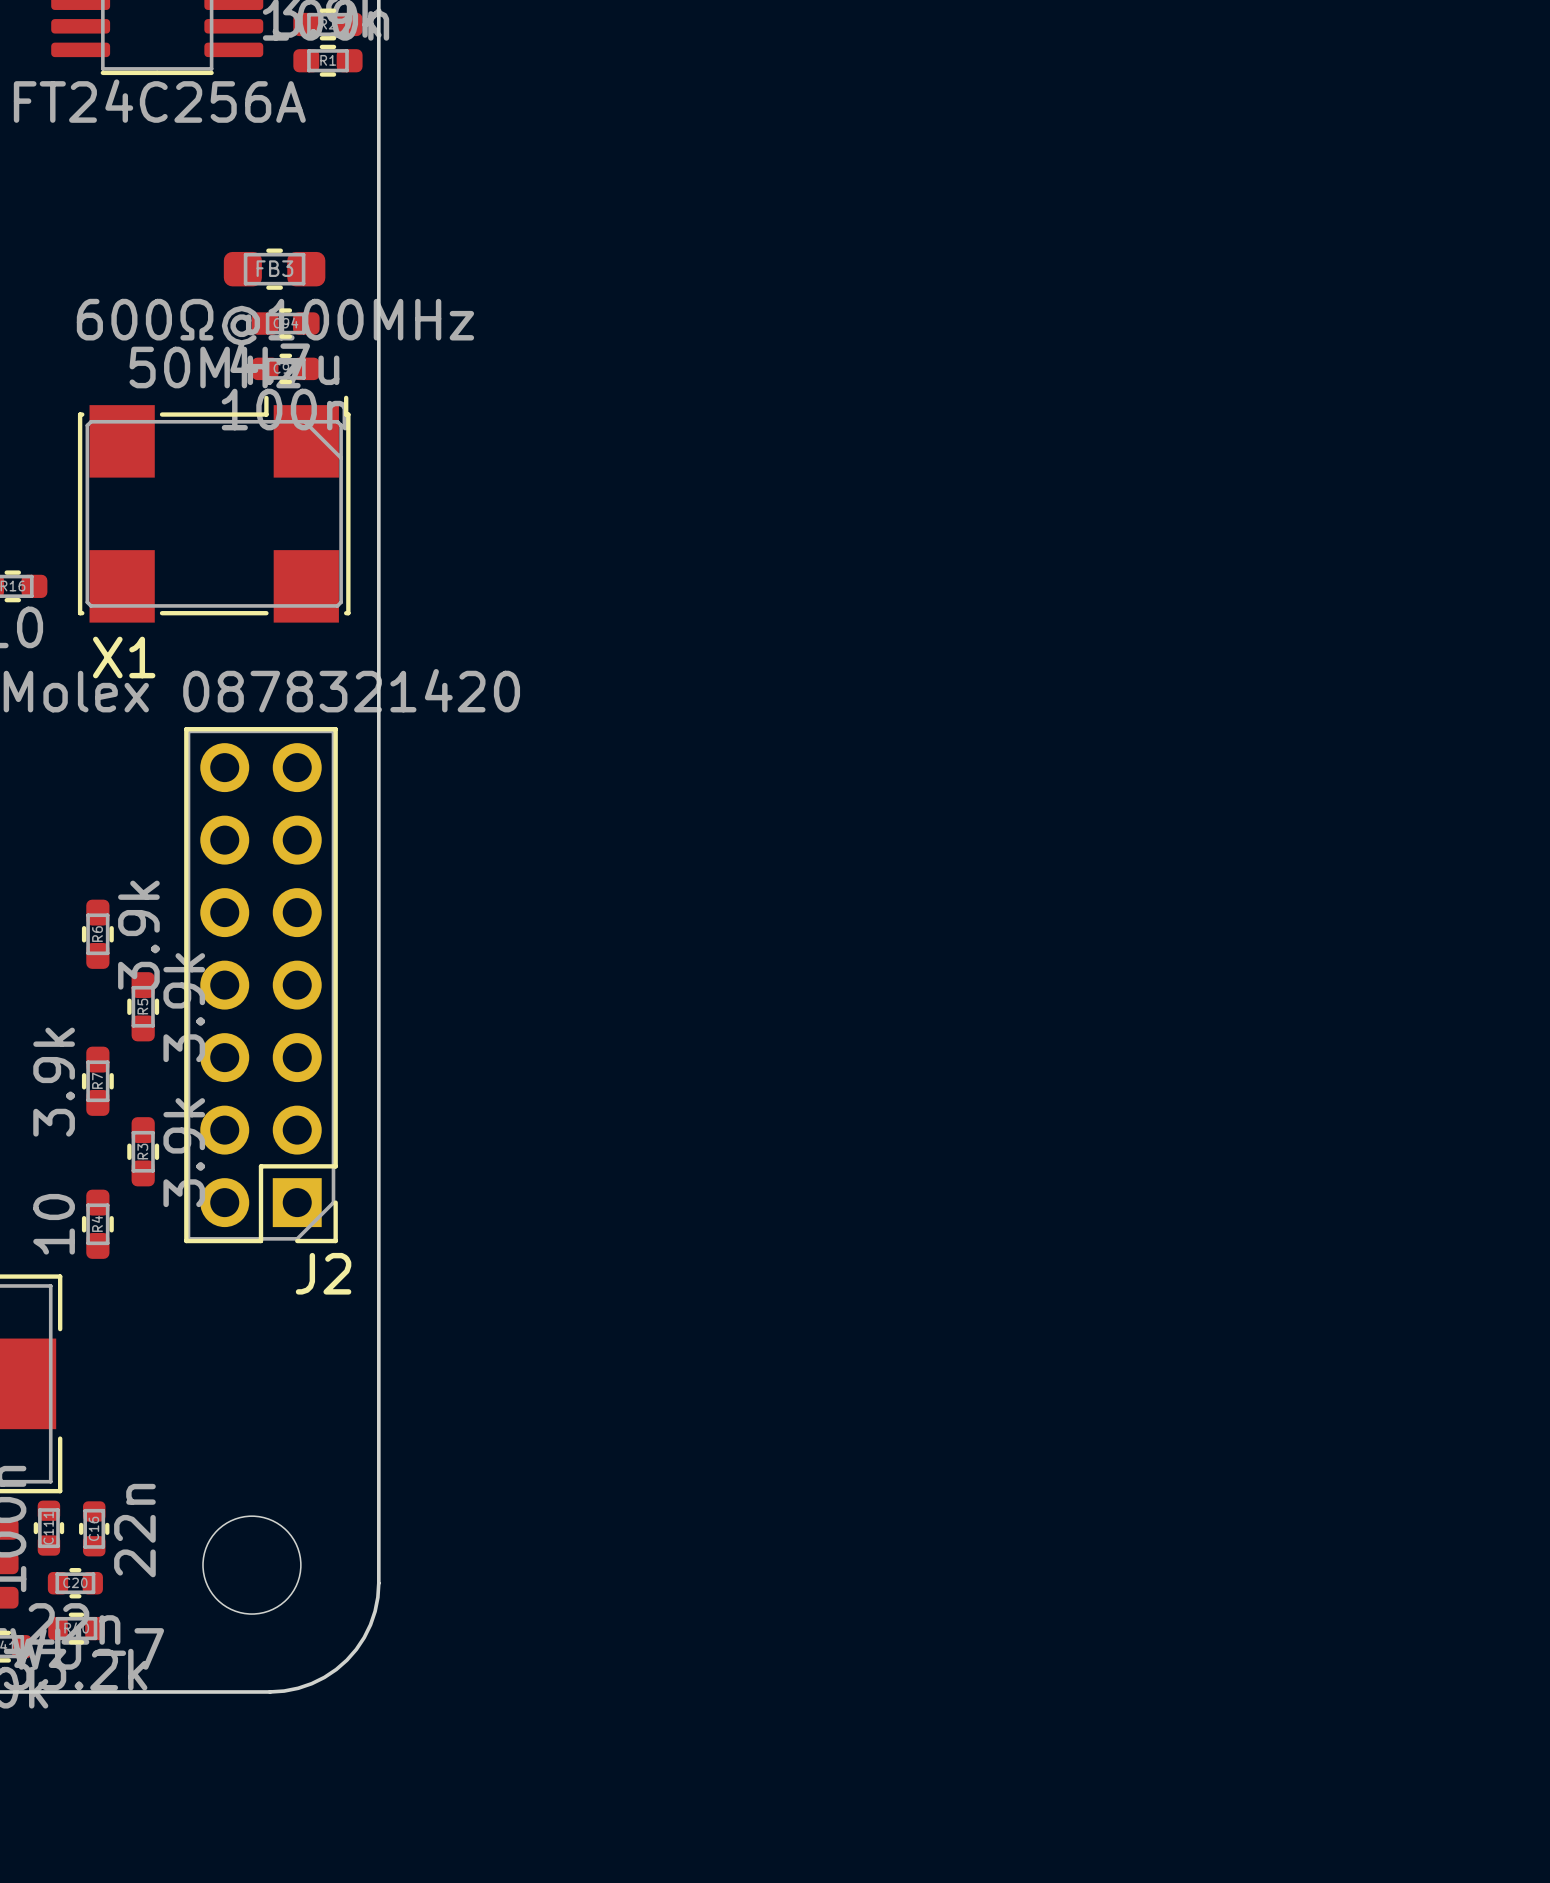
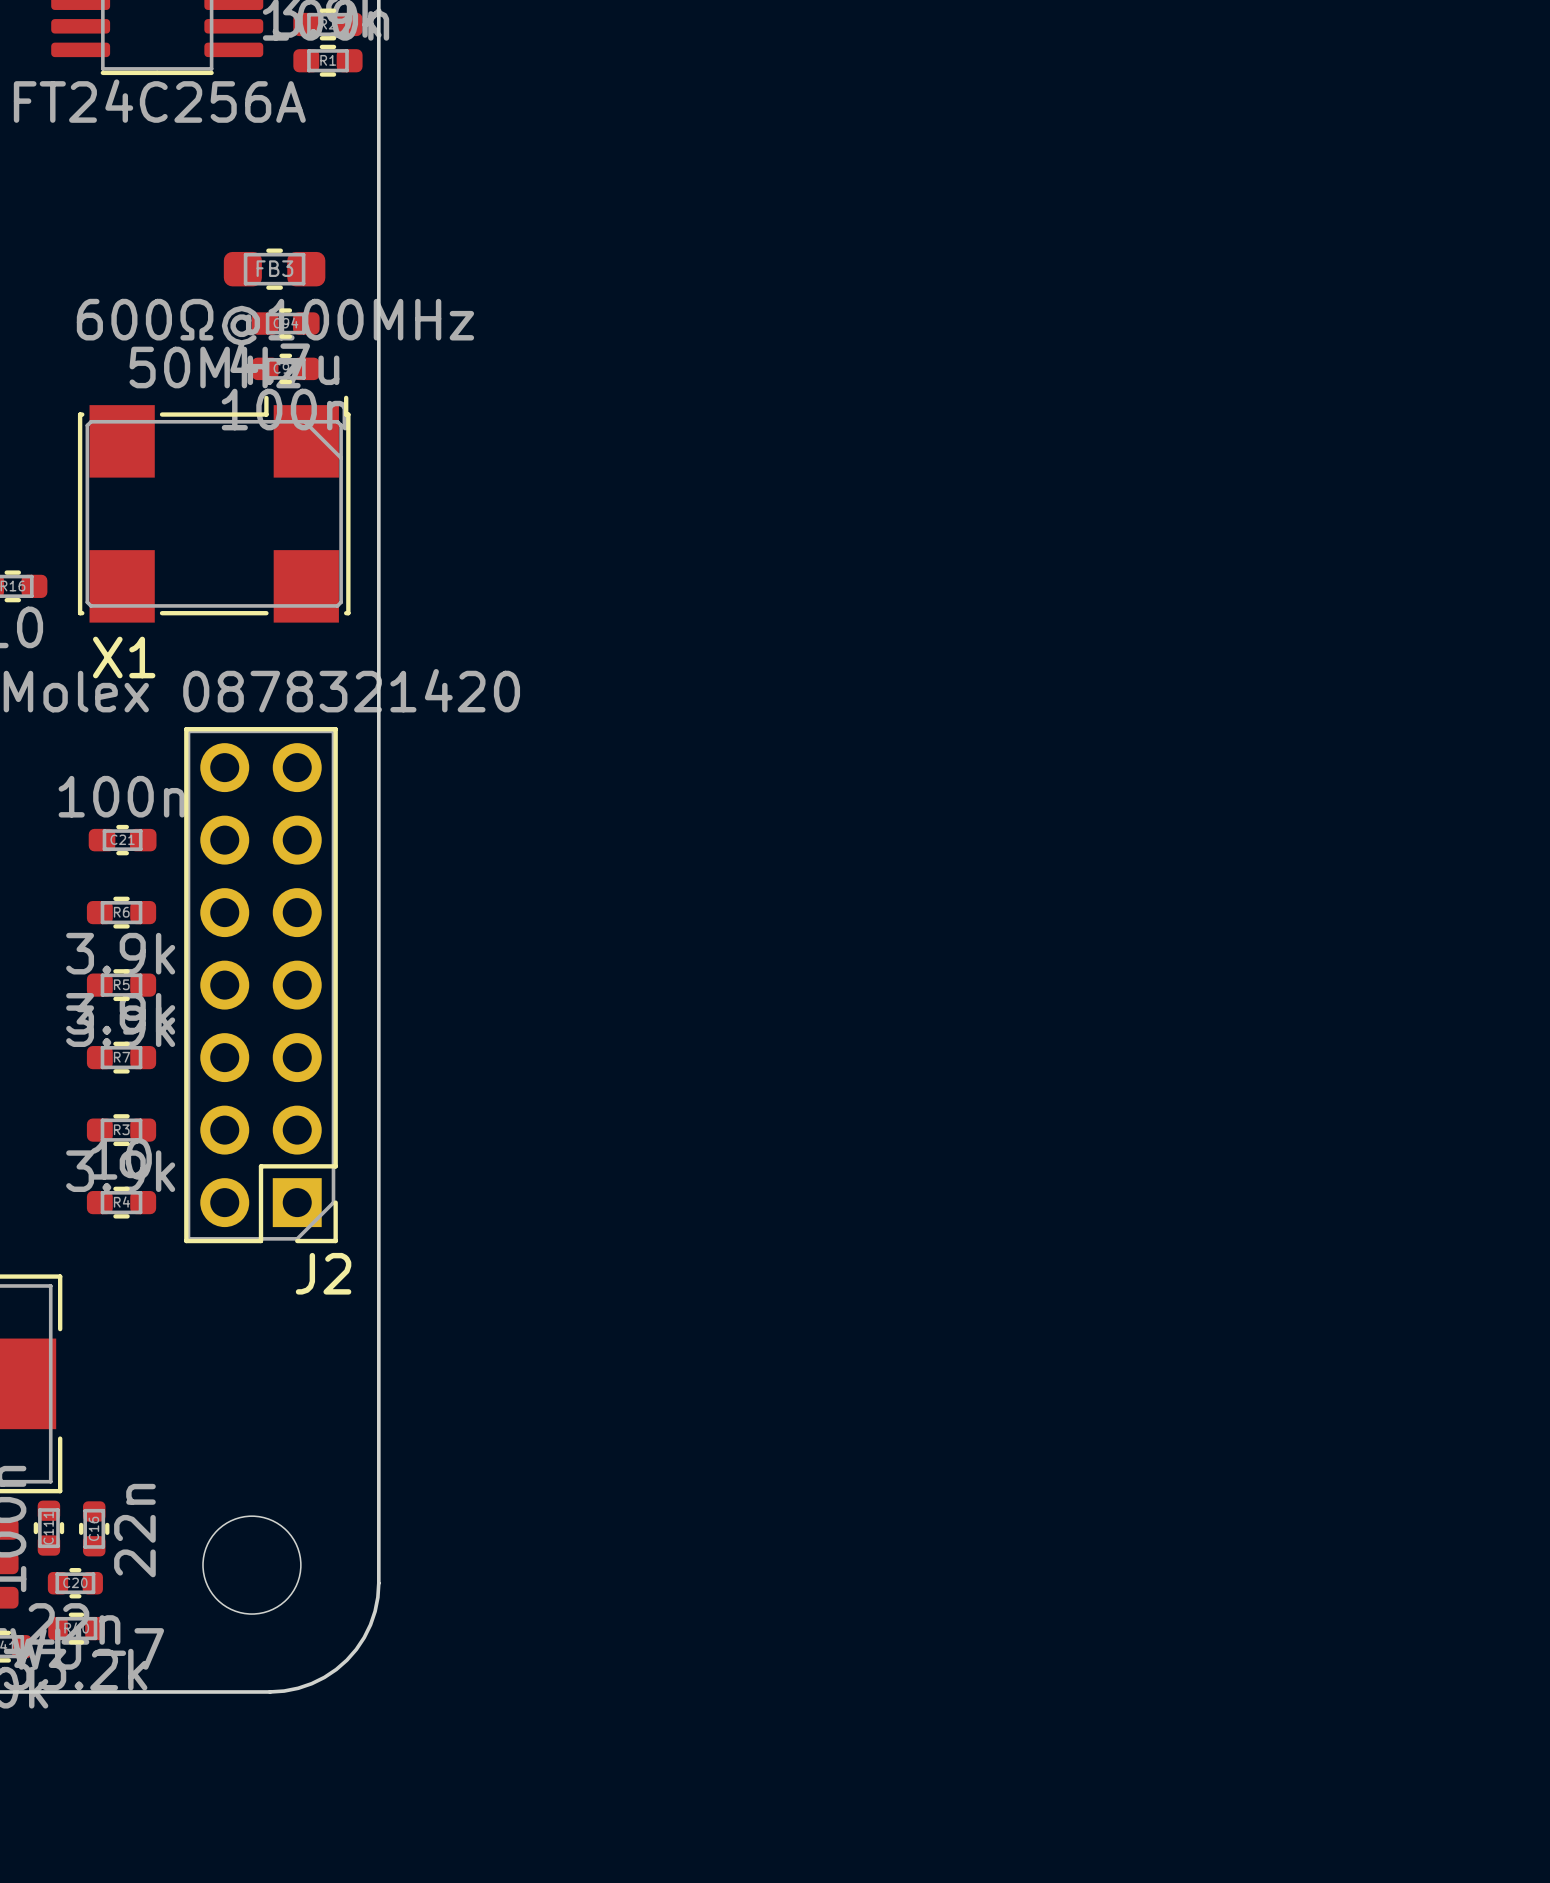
C21: none -> 100n (122, 840)
R6 rotation: 0° (97, 934) -> 90° clockwise (121, 912)
R5 rotation: 0° (143, 1006) -> 90° clockwise (121, 985)
R7 rotation: 0° (97, 1081) -> 90° clockwise (121, 1057)
R3 rotation: 0° (143, 1151) -> 90° clockwise (121, 1130)
R4 rotation: 0° (97, 1224) -> 90° clockwise (121, 1202)

